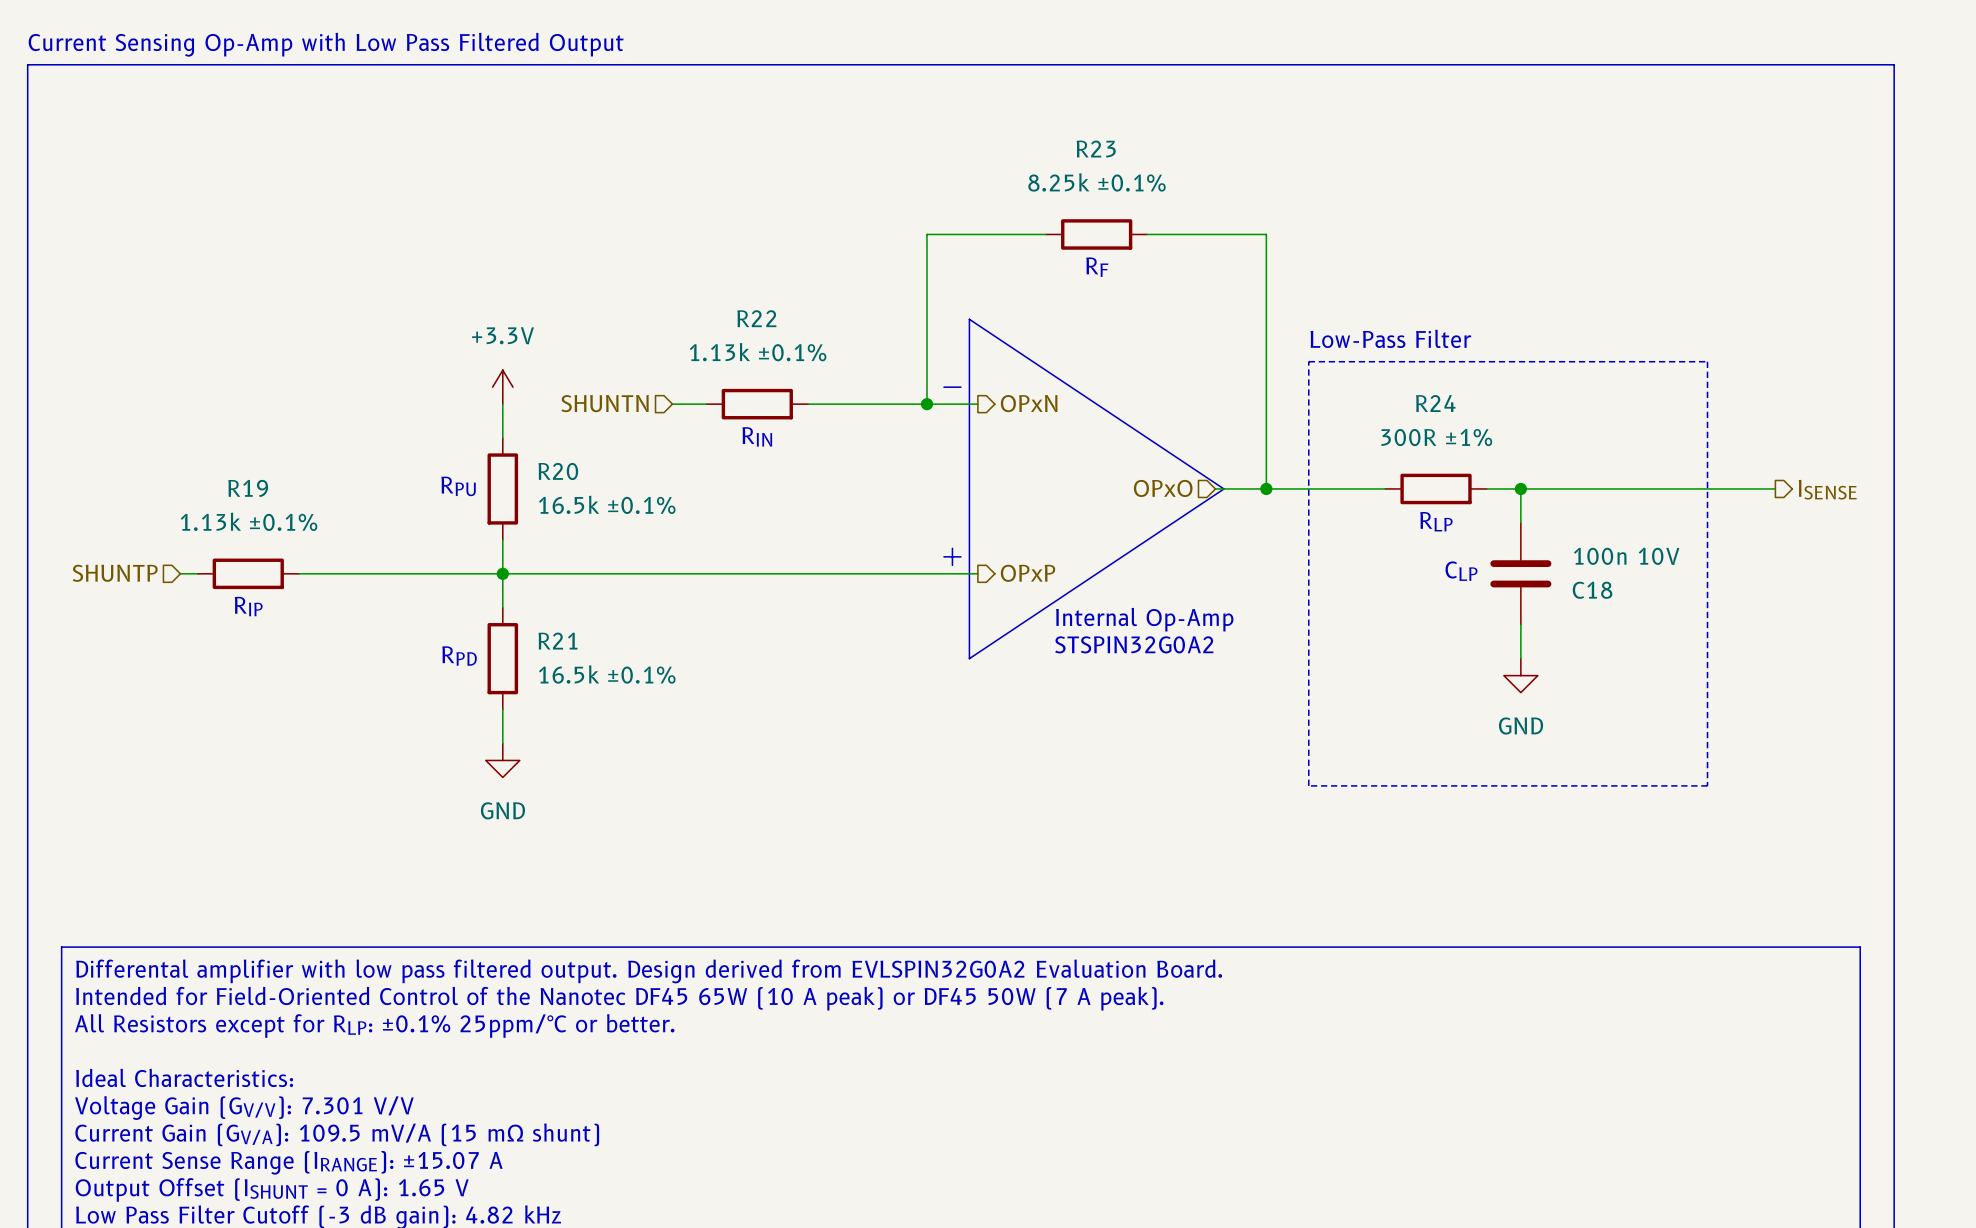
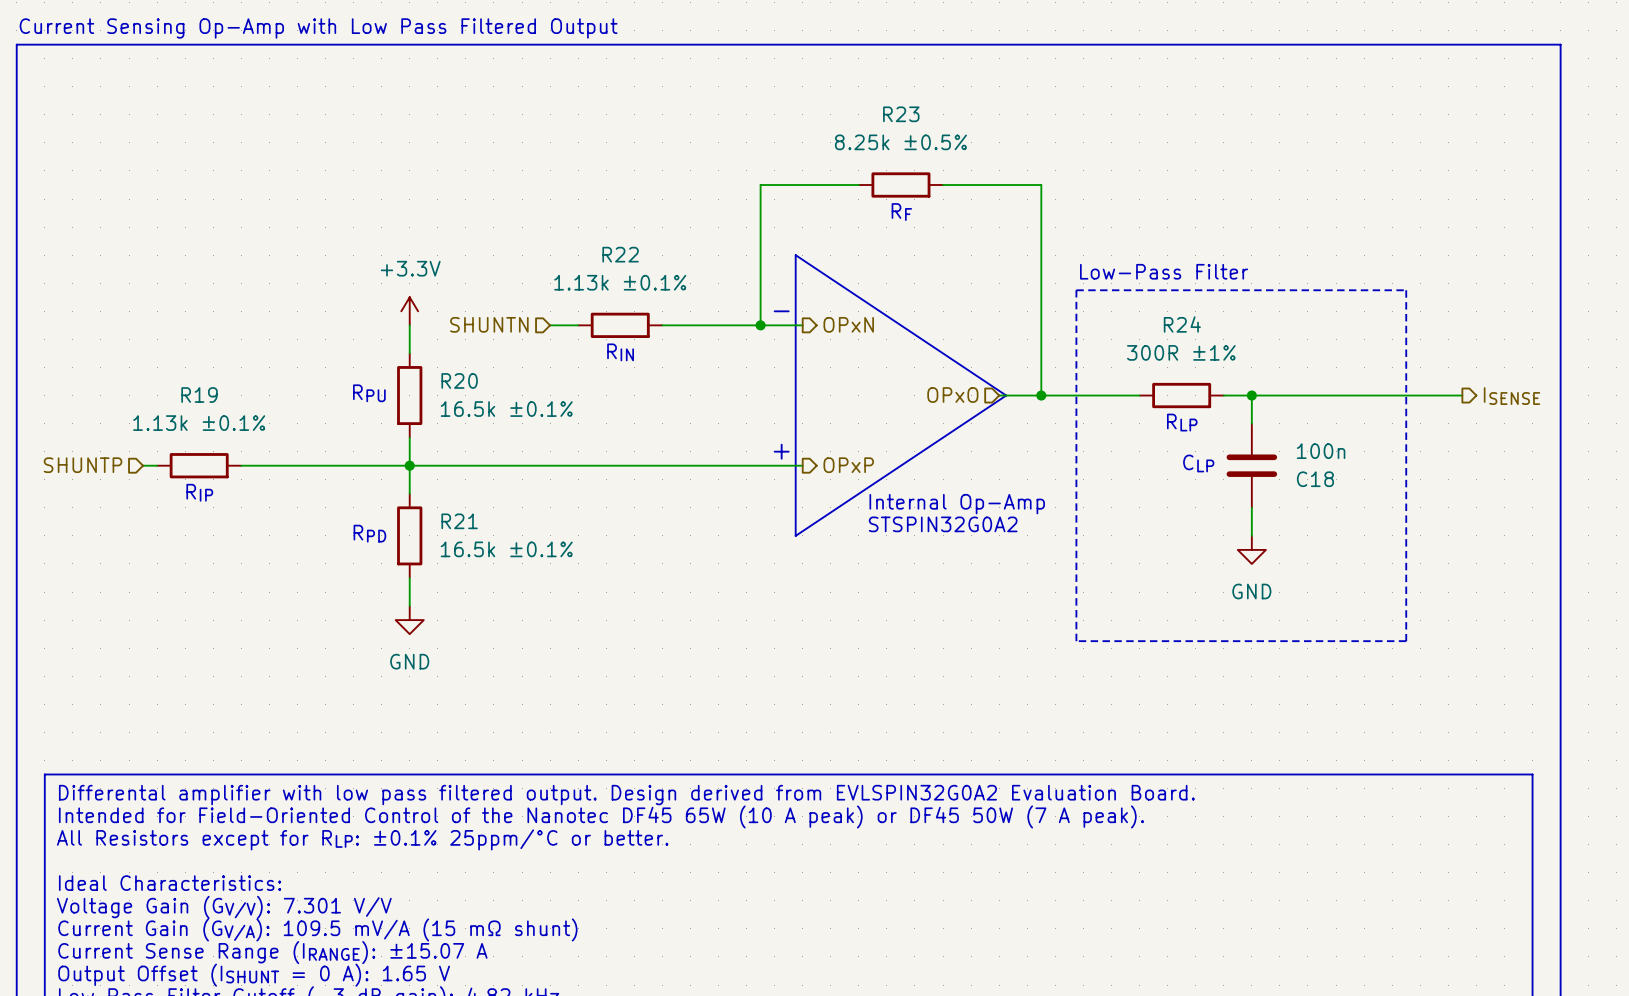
R23 value: 8.25k ±0.1% (1097, 182) -> 8.25k ±0.5% (900, 142)
C18 value: 100n 10V (1626, 556) -> 100n (1321, 451)

